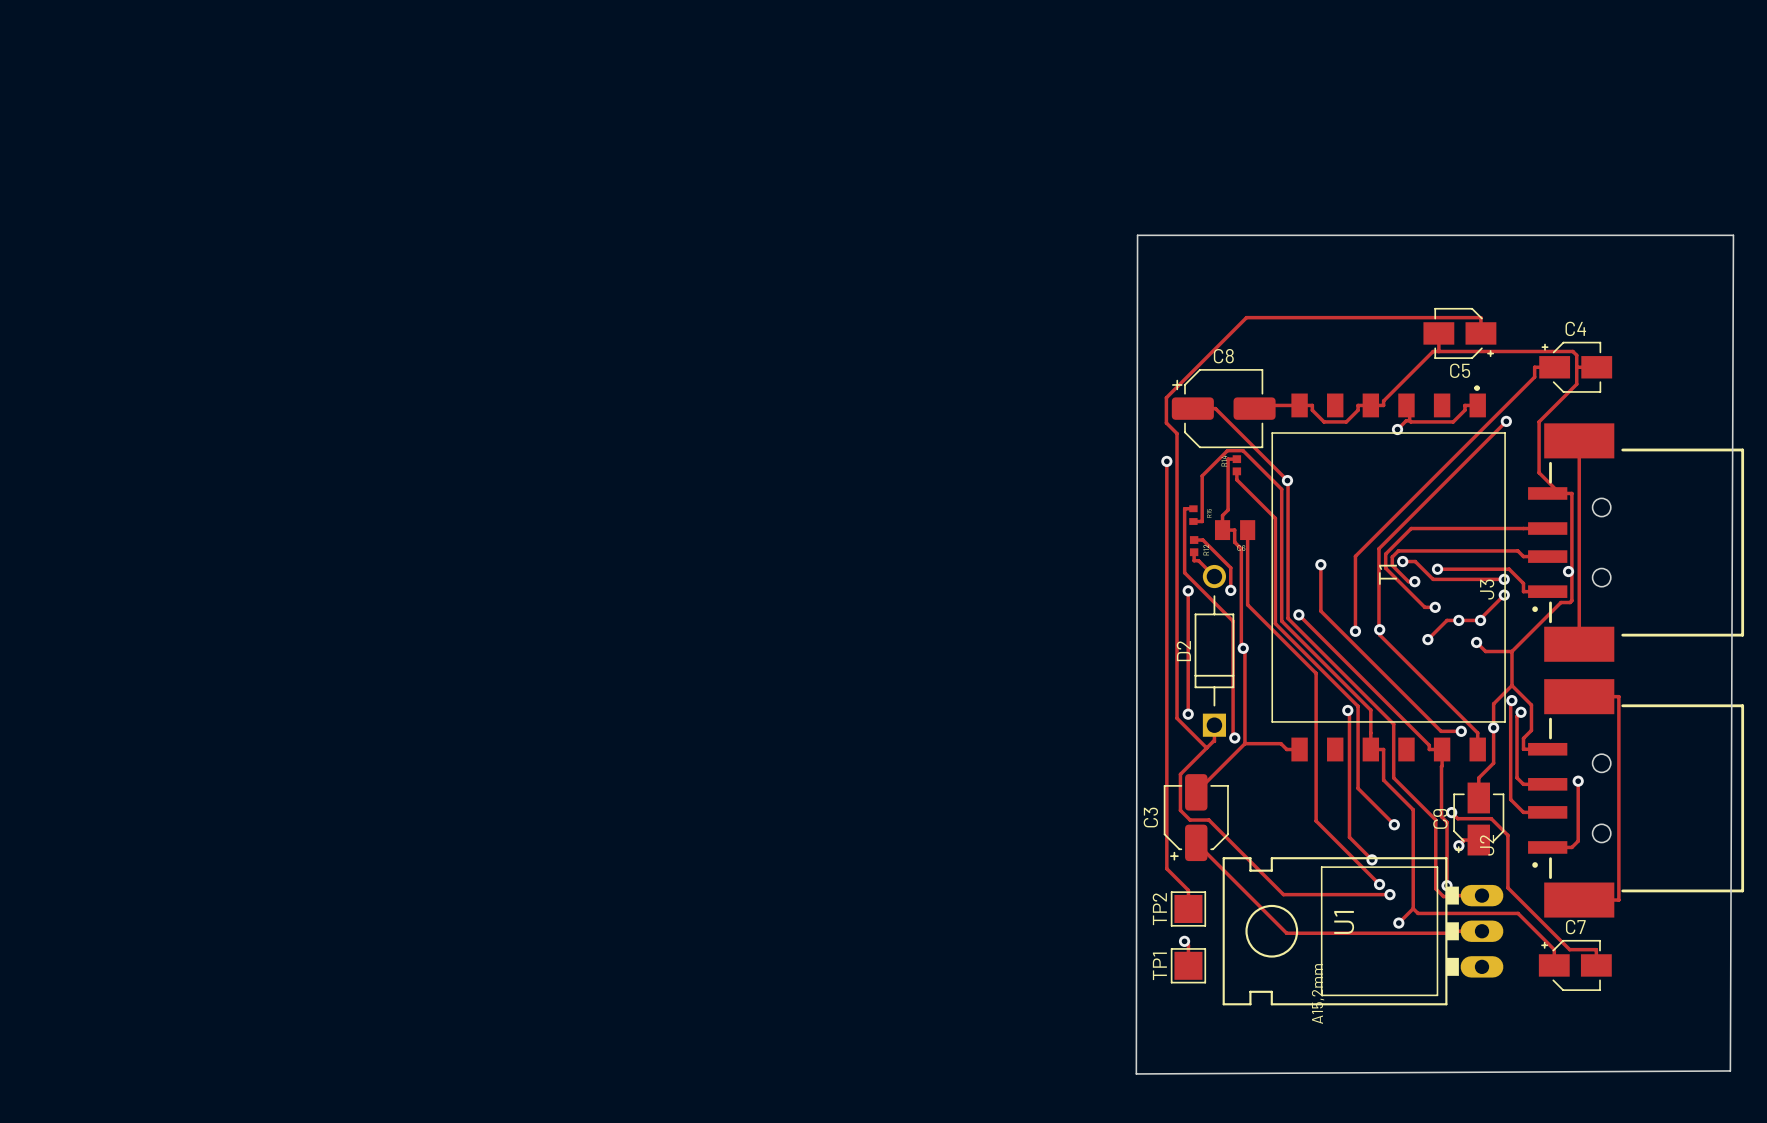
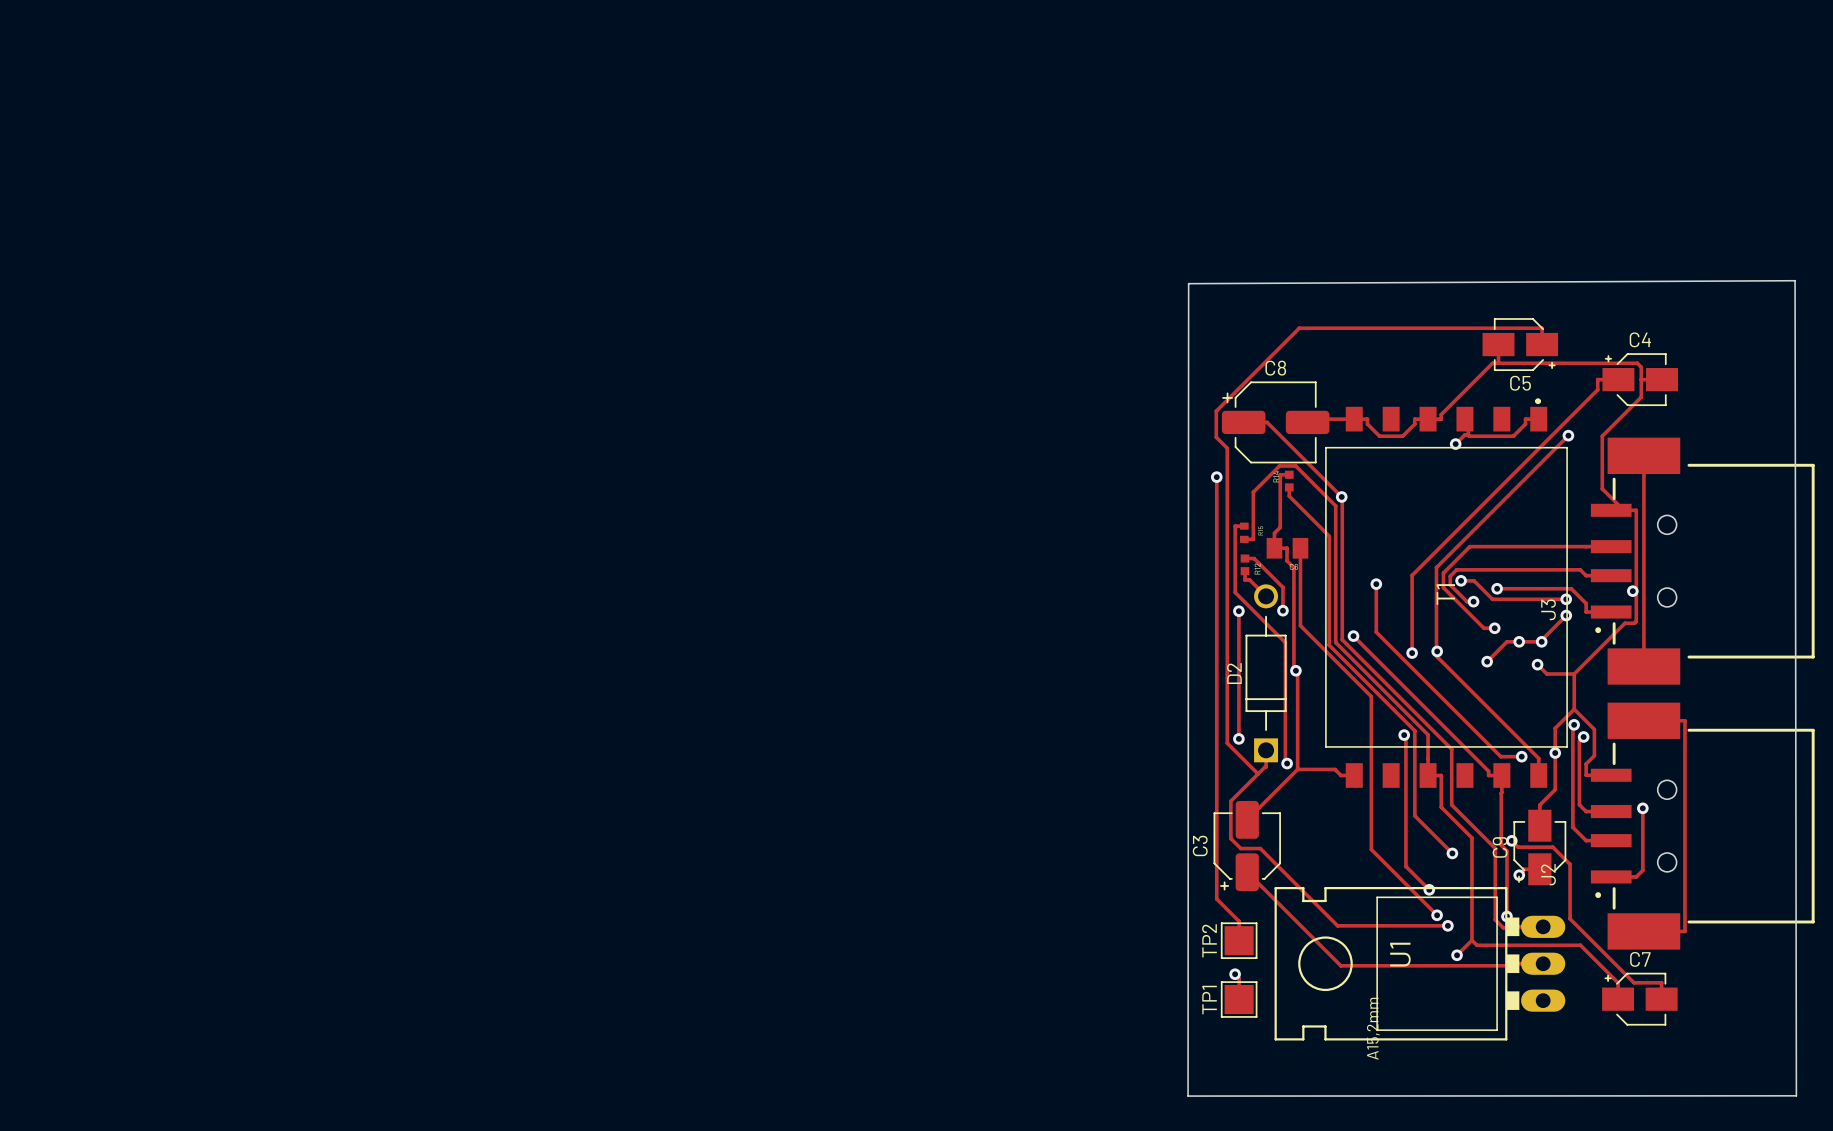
board edge: (1137, 235) (1733, 235) (1730, 1070) (1136, 1073) (1137, 235) -> (1795, 280) (1188, 283) (1188, 1096) (1796, 1095) (1795, 280)

